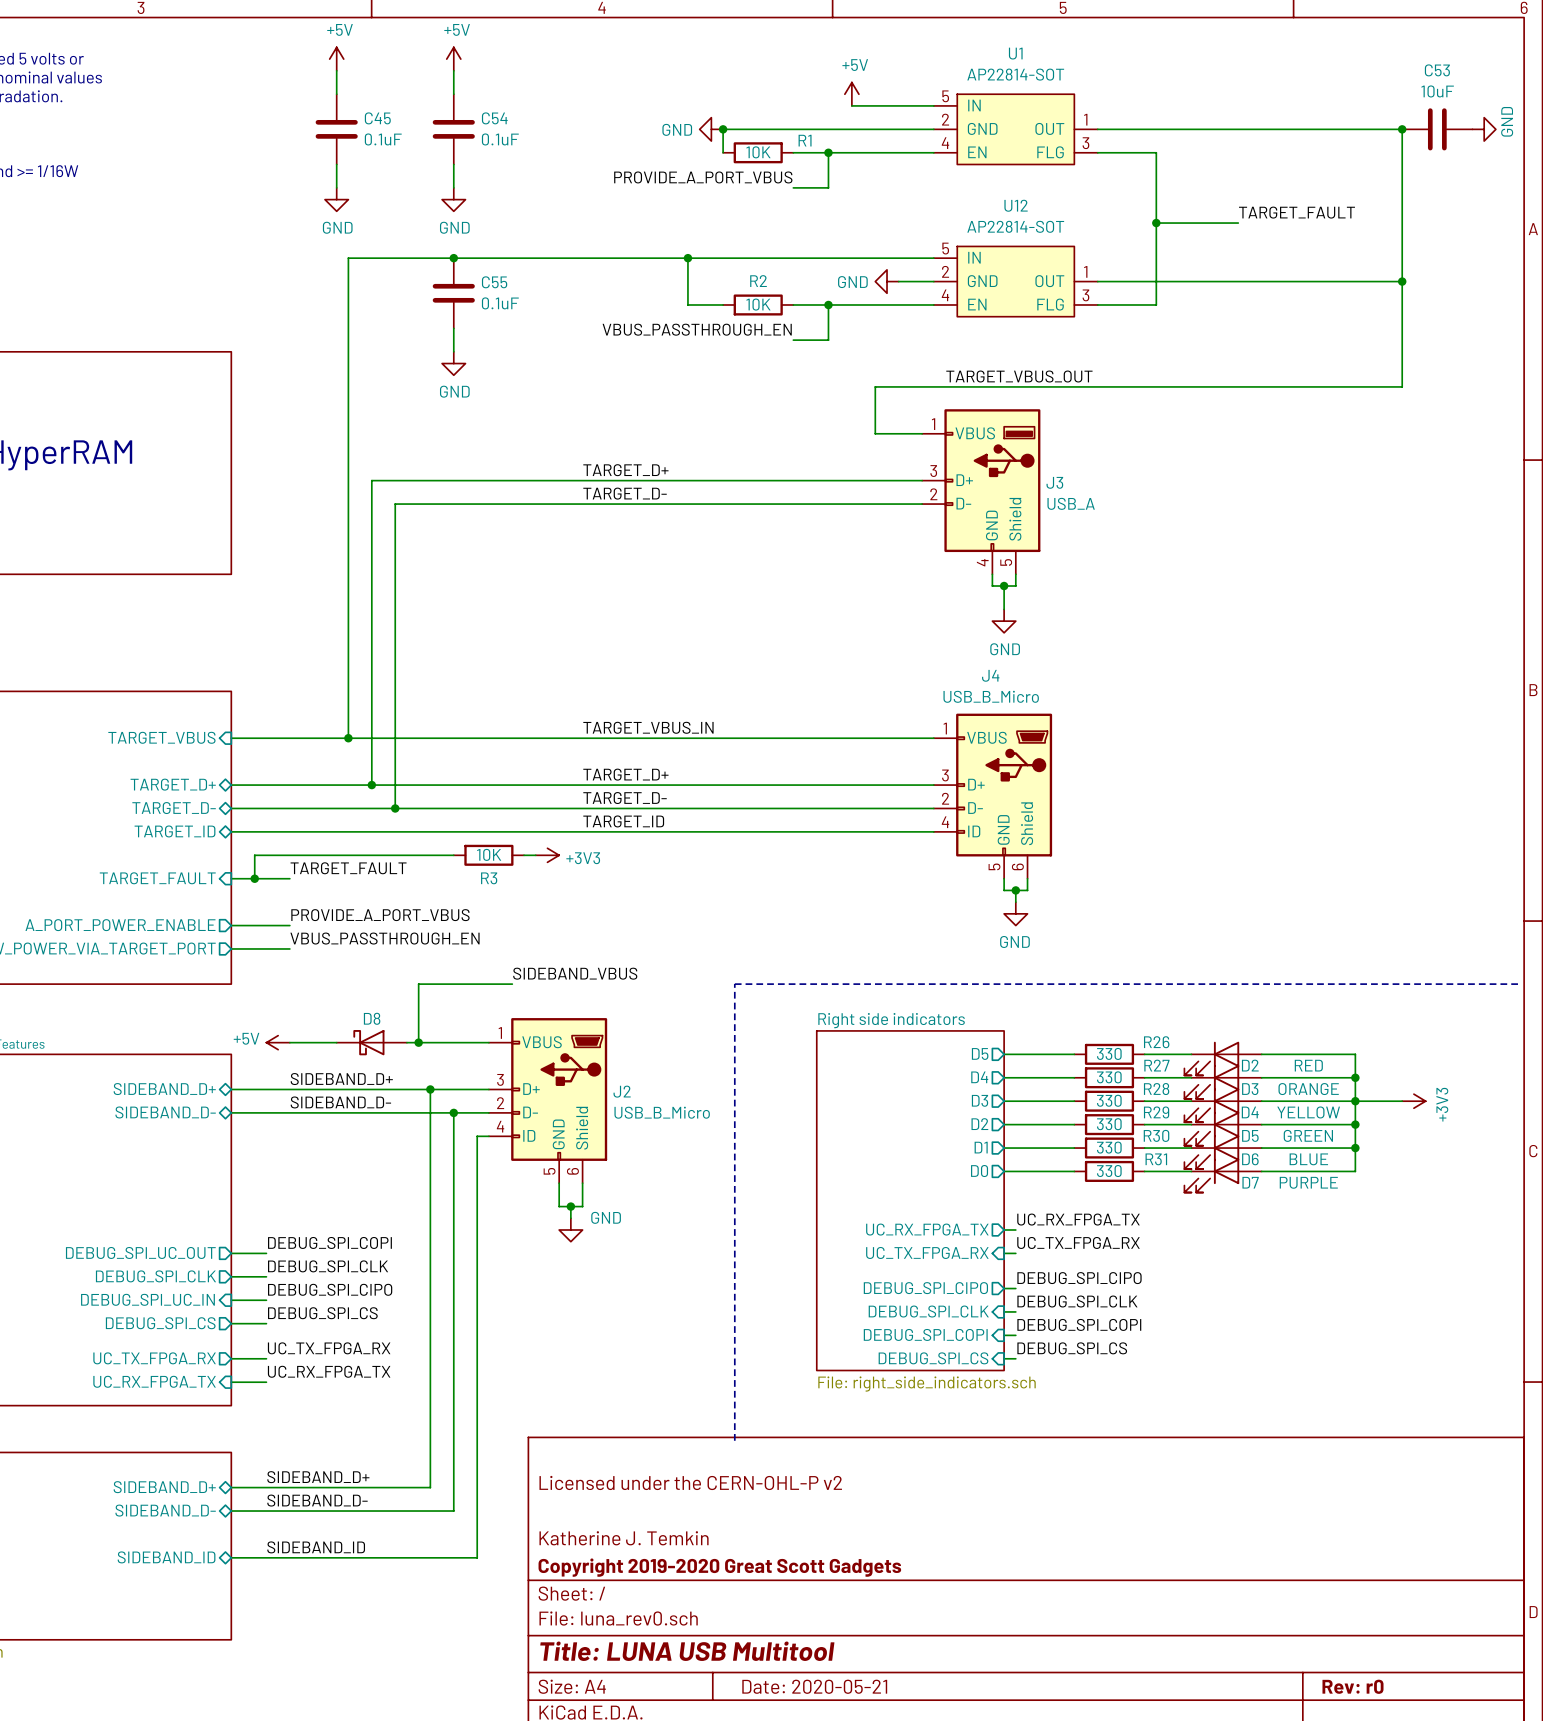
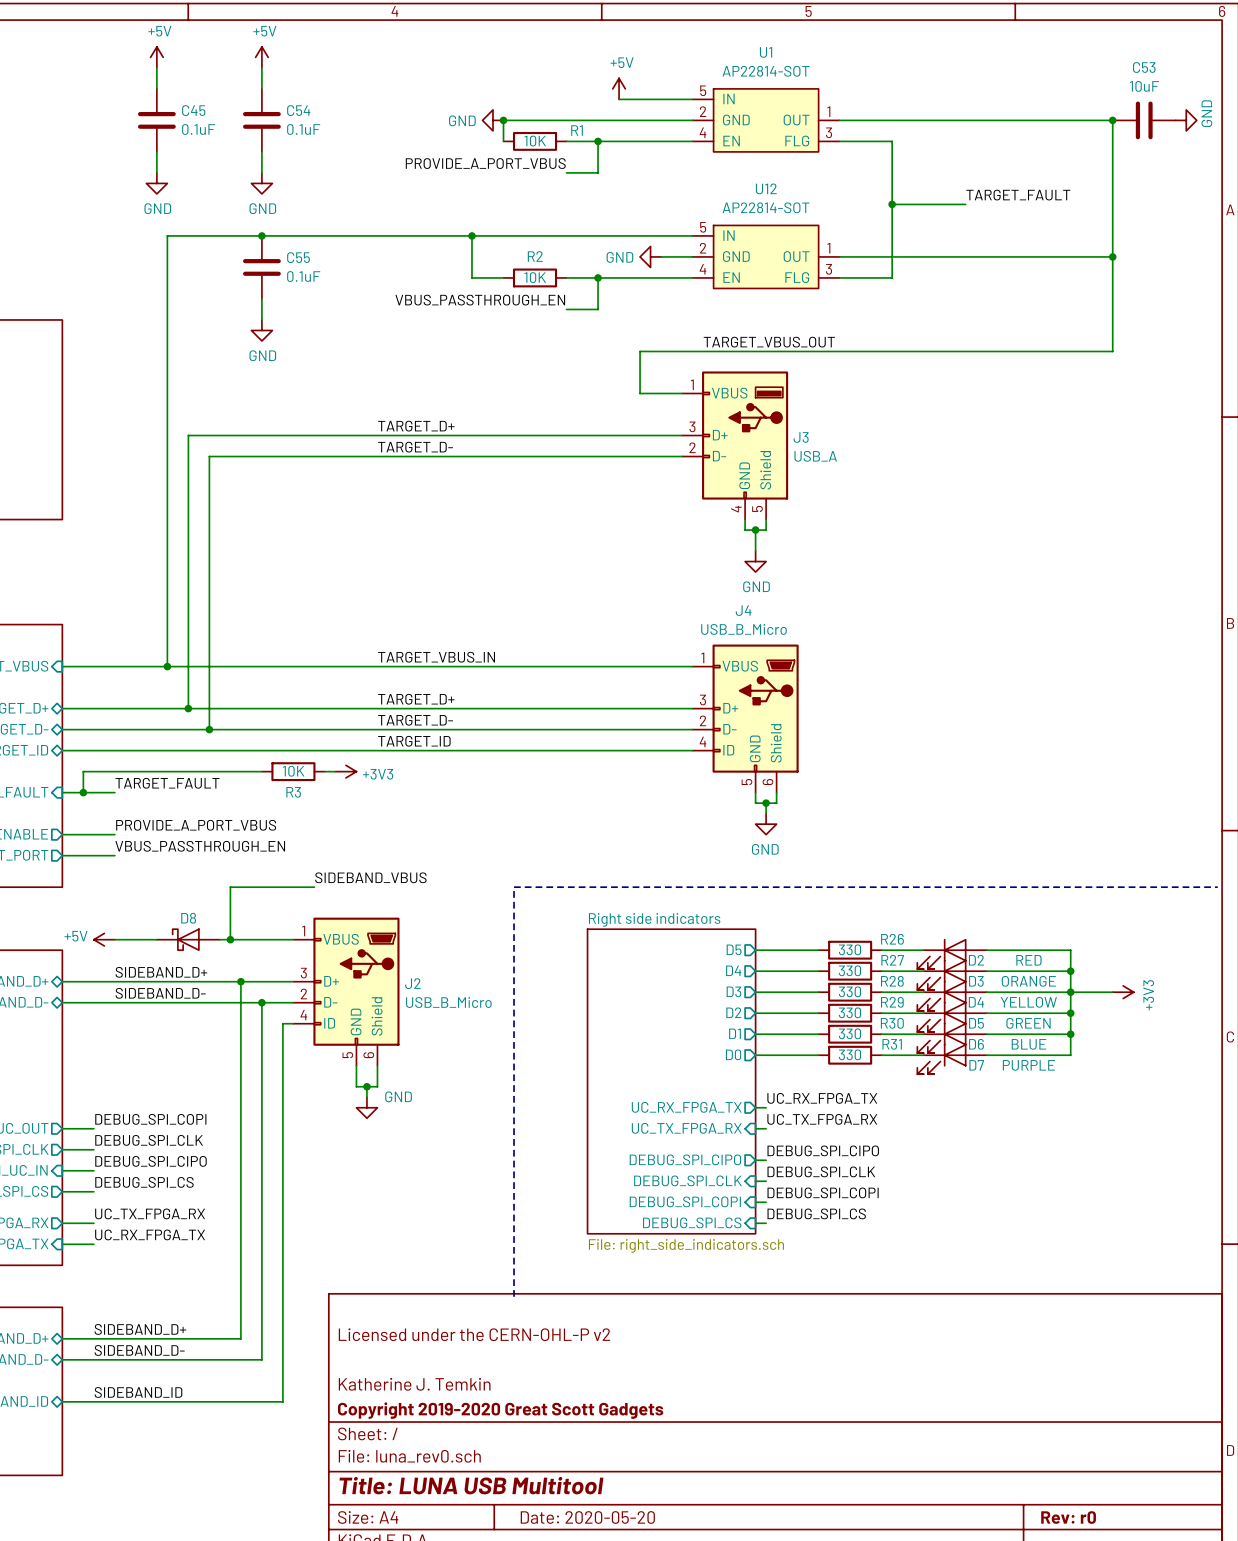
title block: Date: 2020-05-21 (814, 1686) -> Date: 2020-05-20 (587, 1517)

